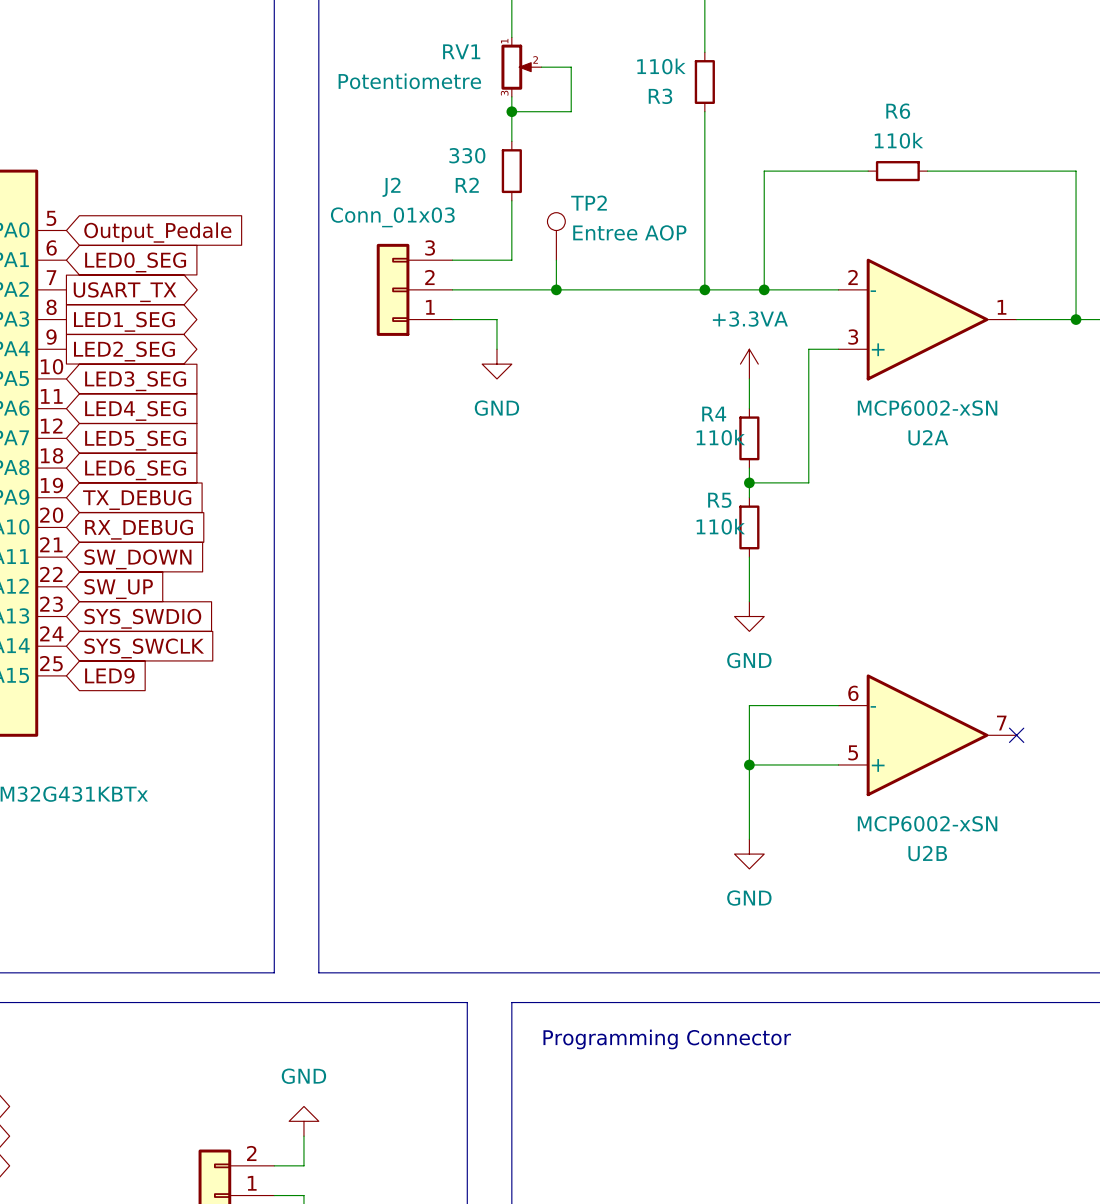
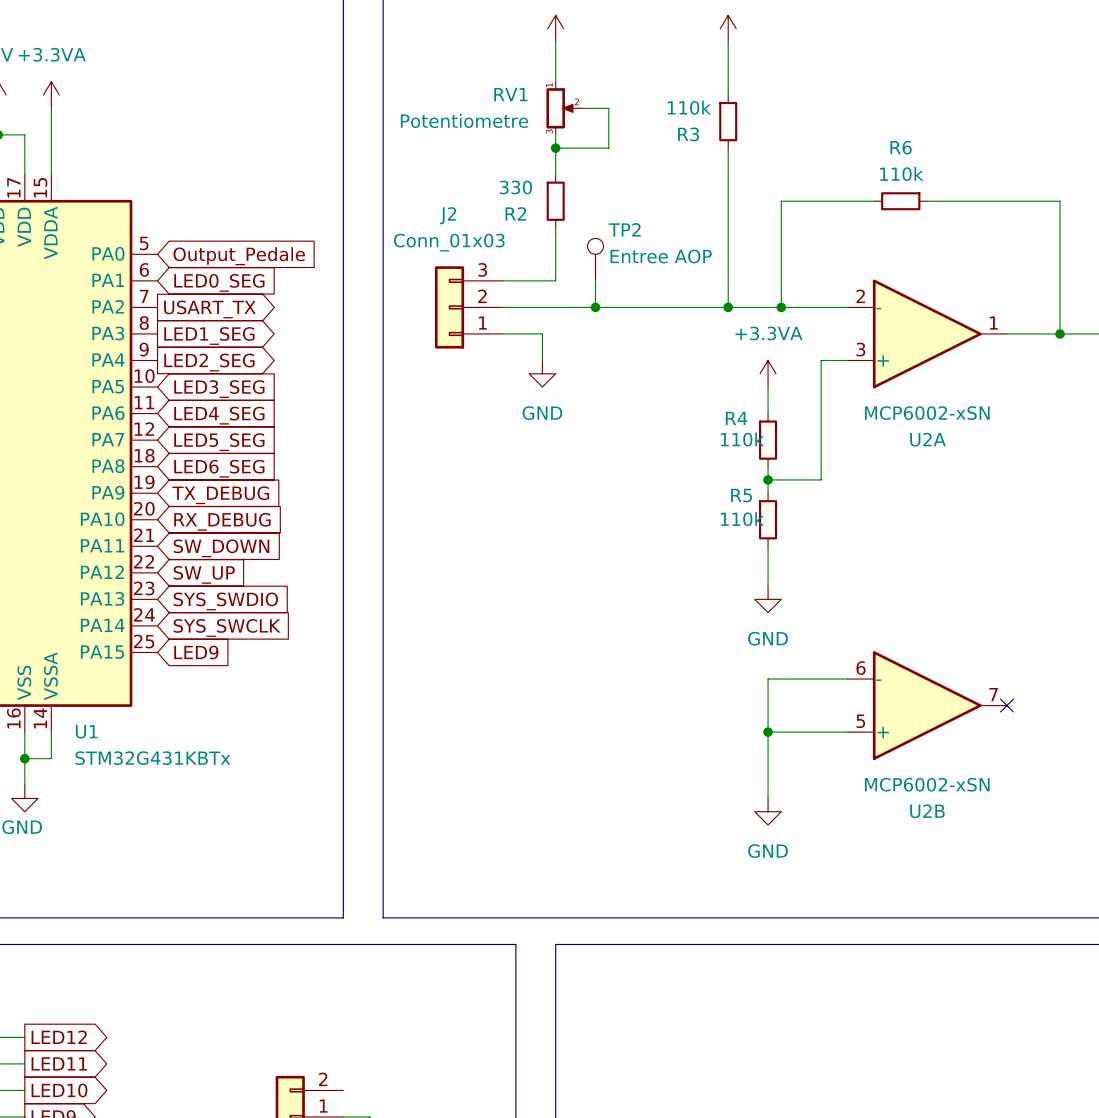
text: Programming Connector (667, 1039) -> none
power symbol: GND (303, 1121) -> none
wire: (303, 1136) (303, 1165) (274, 1165) -> none

